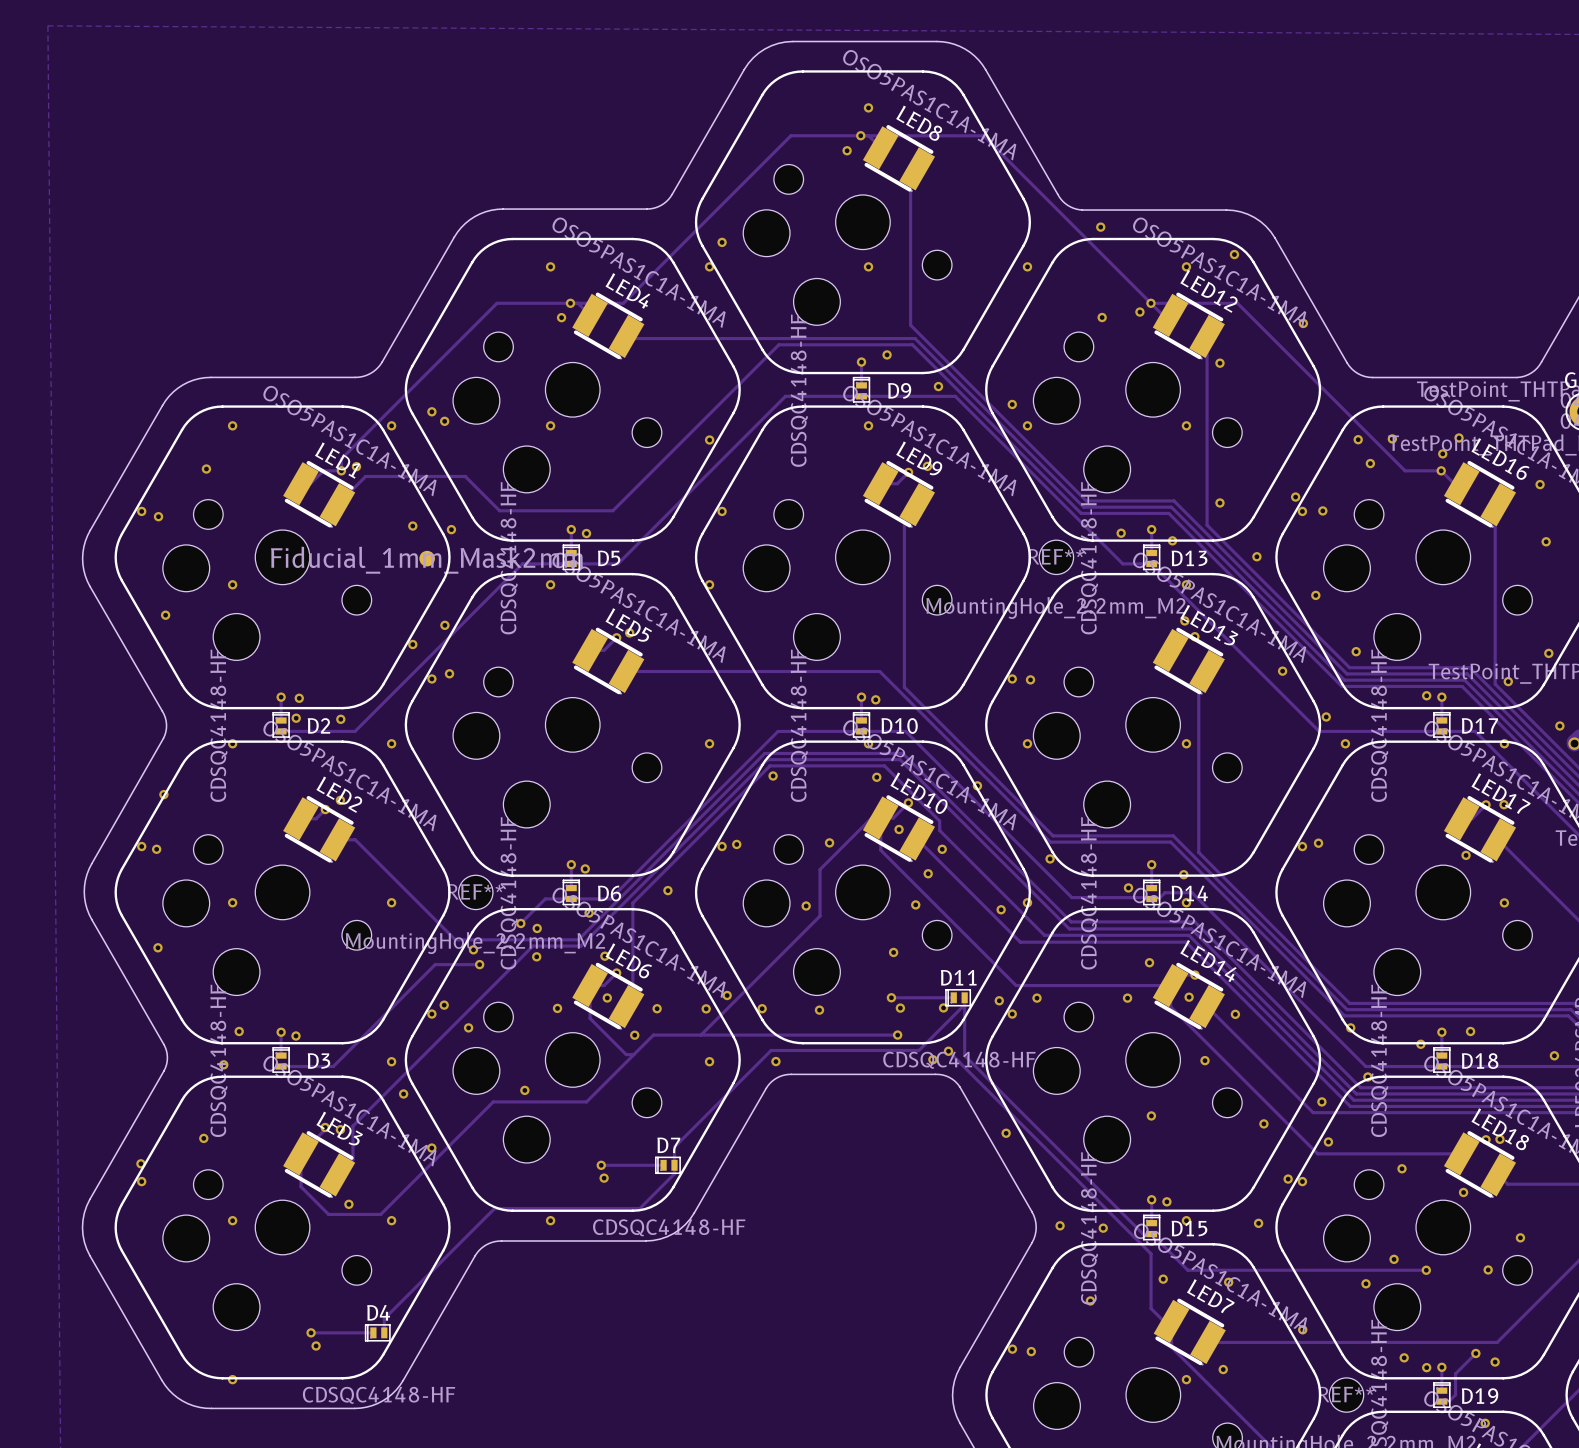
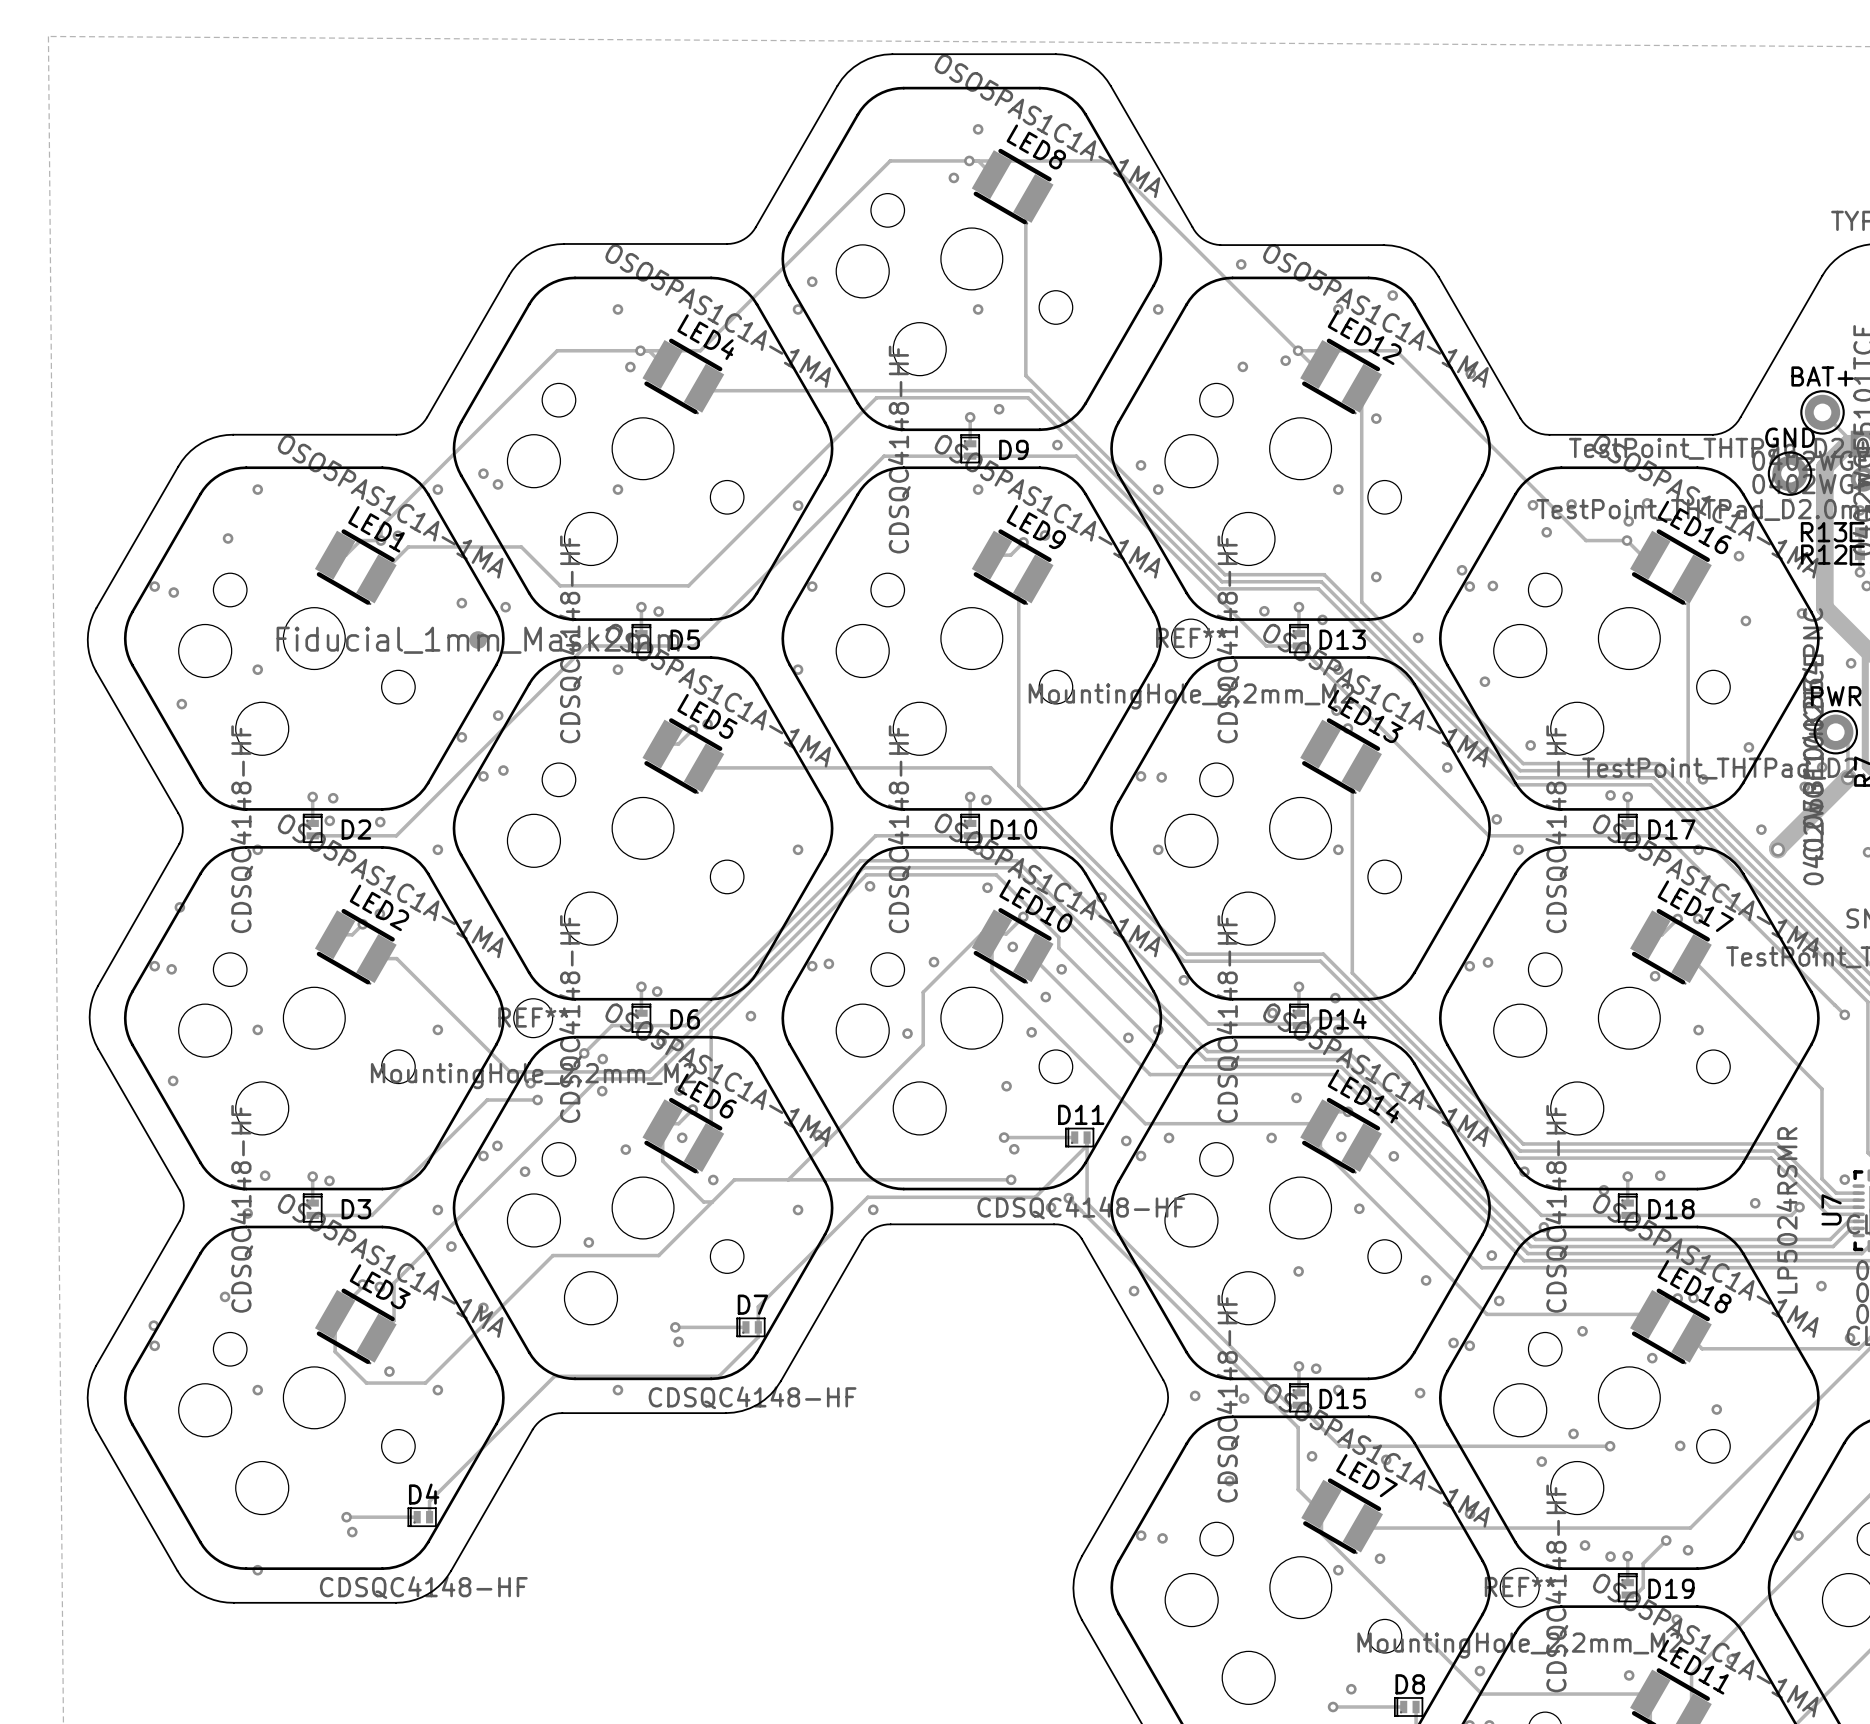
via: (943, 1007) -> none
via: (657, 1008) -> none
via: (706, 1008) -> none
via: (762, 1008) -> none
via: (819, 1010) -> none

